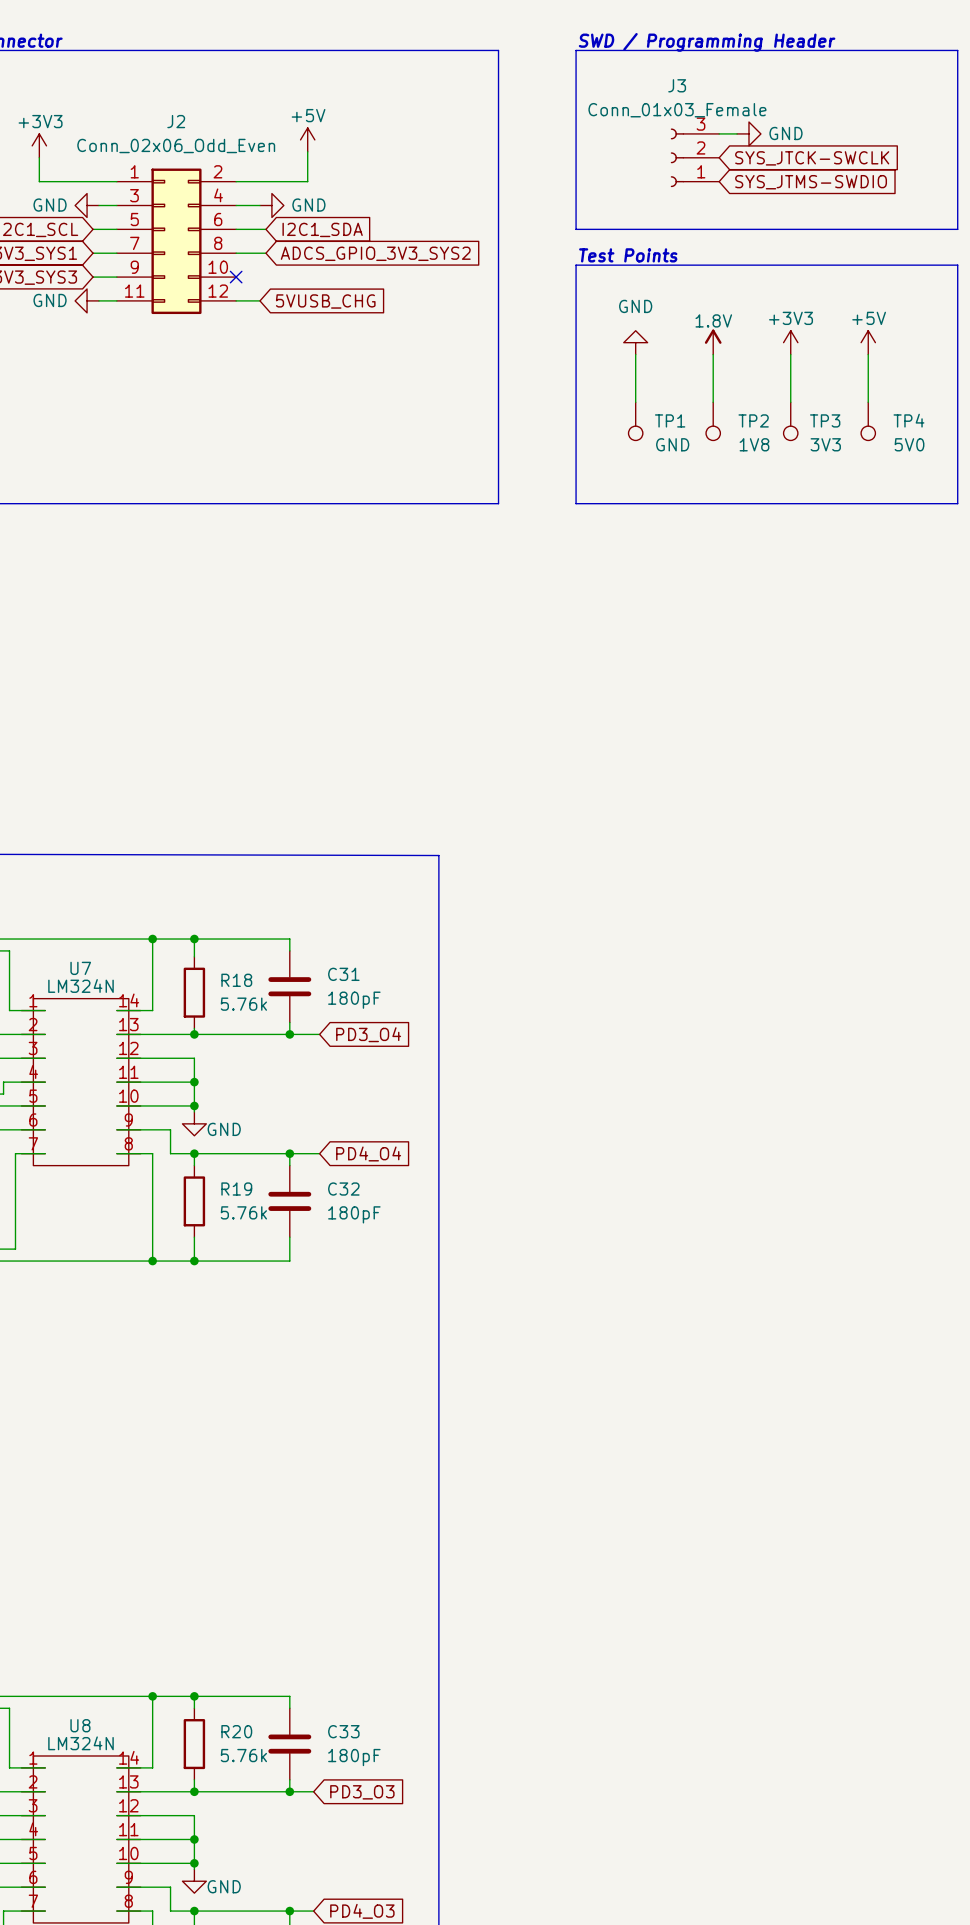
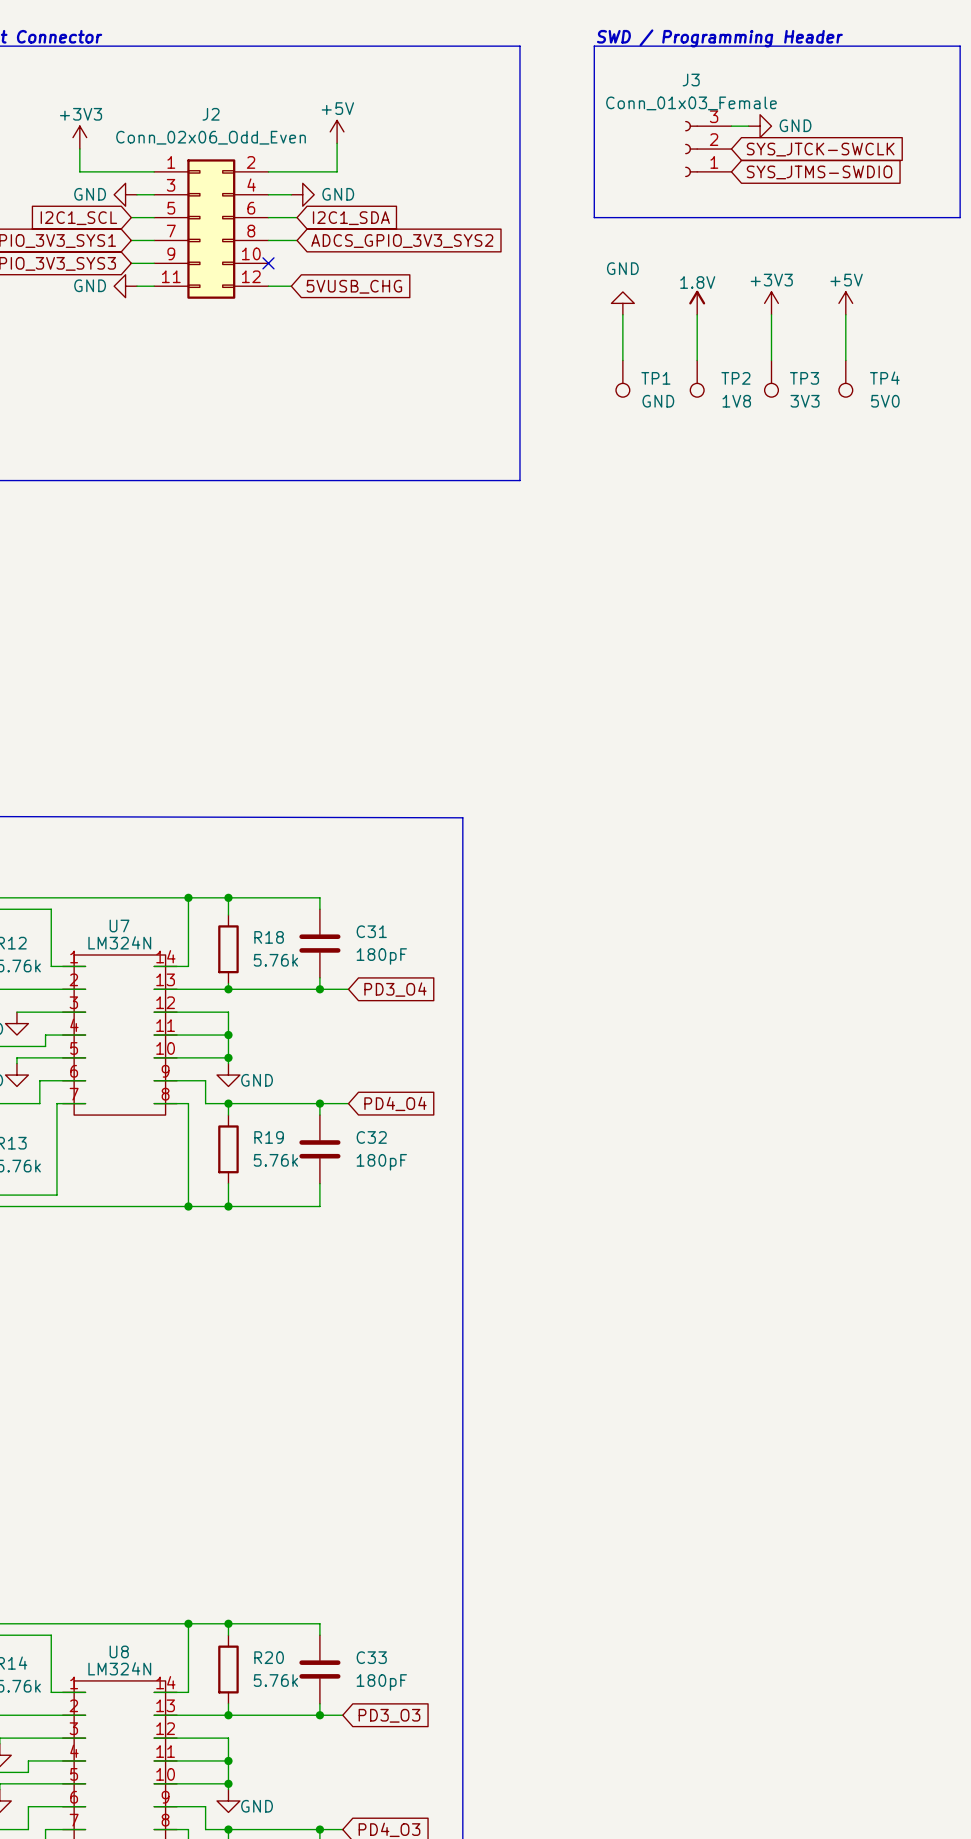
text: Test Points (628, 255) -> none
line: (576, 265) (957, 265) (957, 503) (576, 503) (576, 265) -> none
power symbol position: GND (635, 342) -> GND (622, 303)
power symbol position: 1.8V (713, 342) -> 1.8V (697, 302)
power symbol position: +3V3 (790, 342) -> +3V3 (771, 303)
power symbol position: +5V (868, 342) -> +5V (845, 303)
wire: (635, 354) (635, 402) -> (622, 314) (622, 360)
wire: (713, 354) (713, 402) -> (697, 314) (697, 360)
wire: (790, 354) (790, 402) -> (771, 314) (771, 360)
wire: (868, 354) (868, 402) -> (845, 314) (845, 360)
TP1 position: (635, 421) -> (622, 378)
TP2 position: (713, 421) -> (697, 378)
TP3 position: (790, 421) -> (771, 378)
TP4 position: (868, 421) -> (845, 378)

